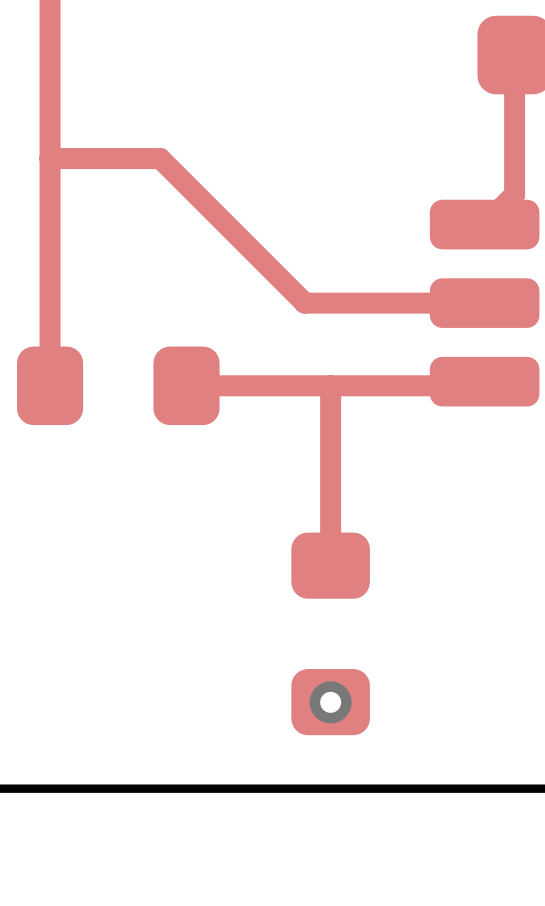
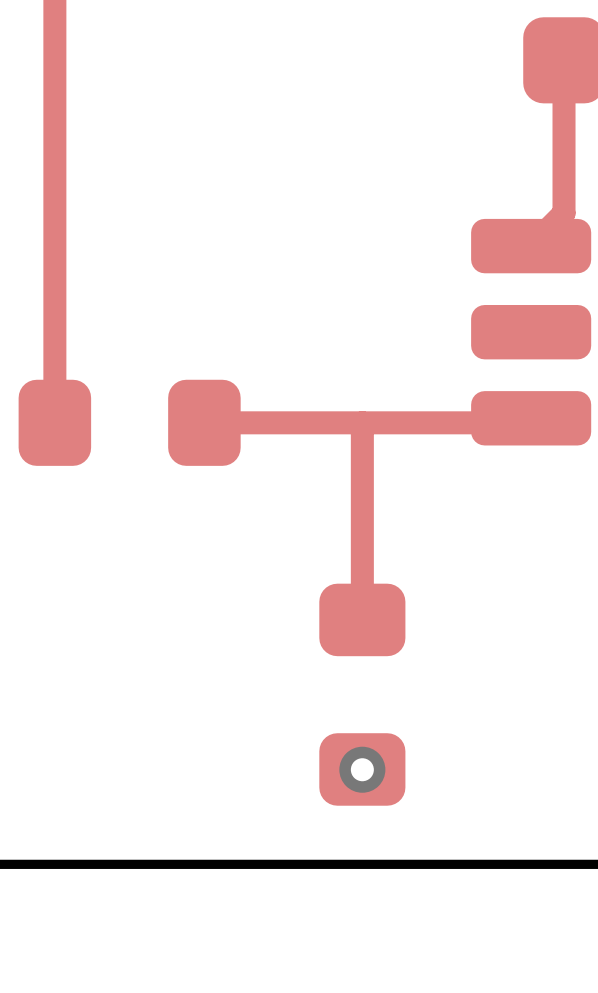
top track: (50, 158) (160, 158) (304, 303) (523, 303) -> none

